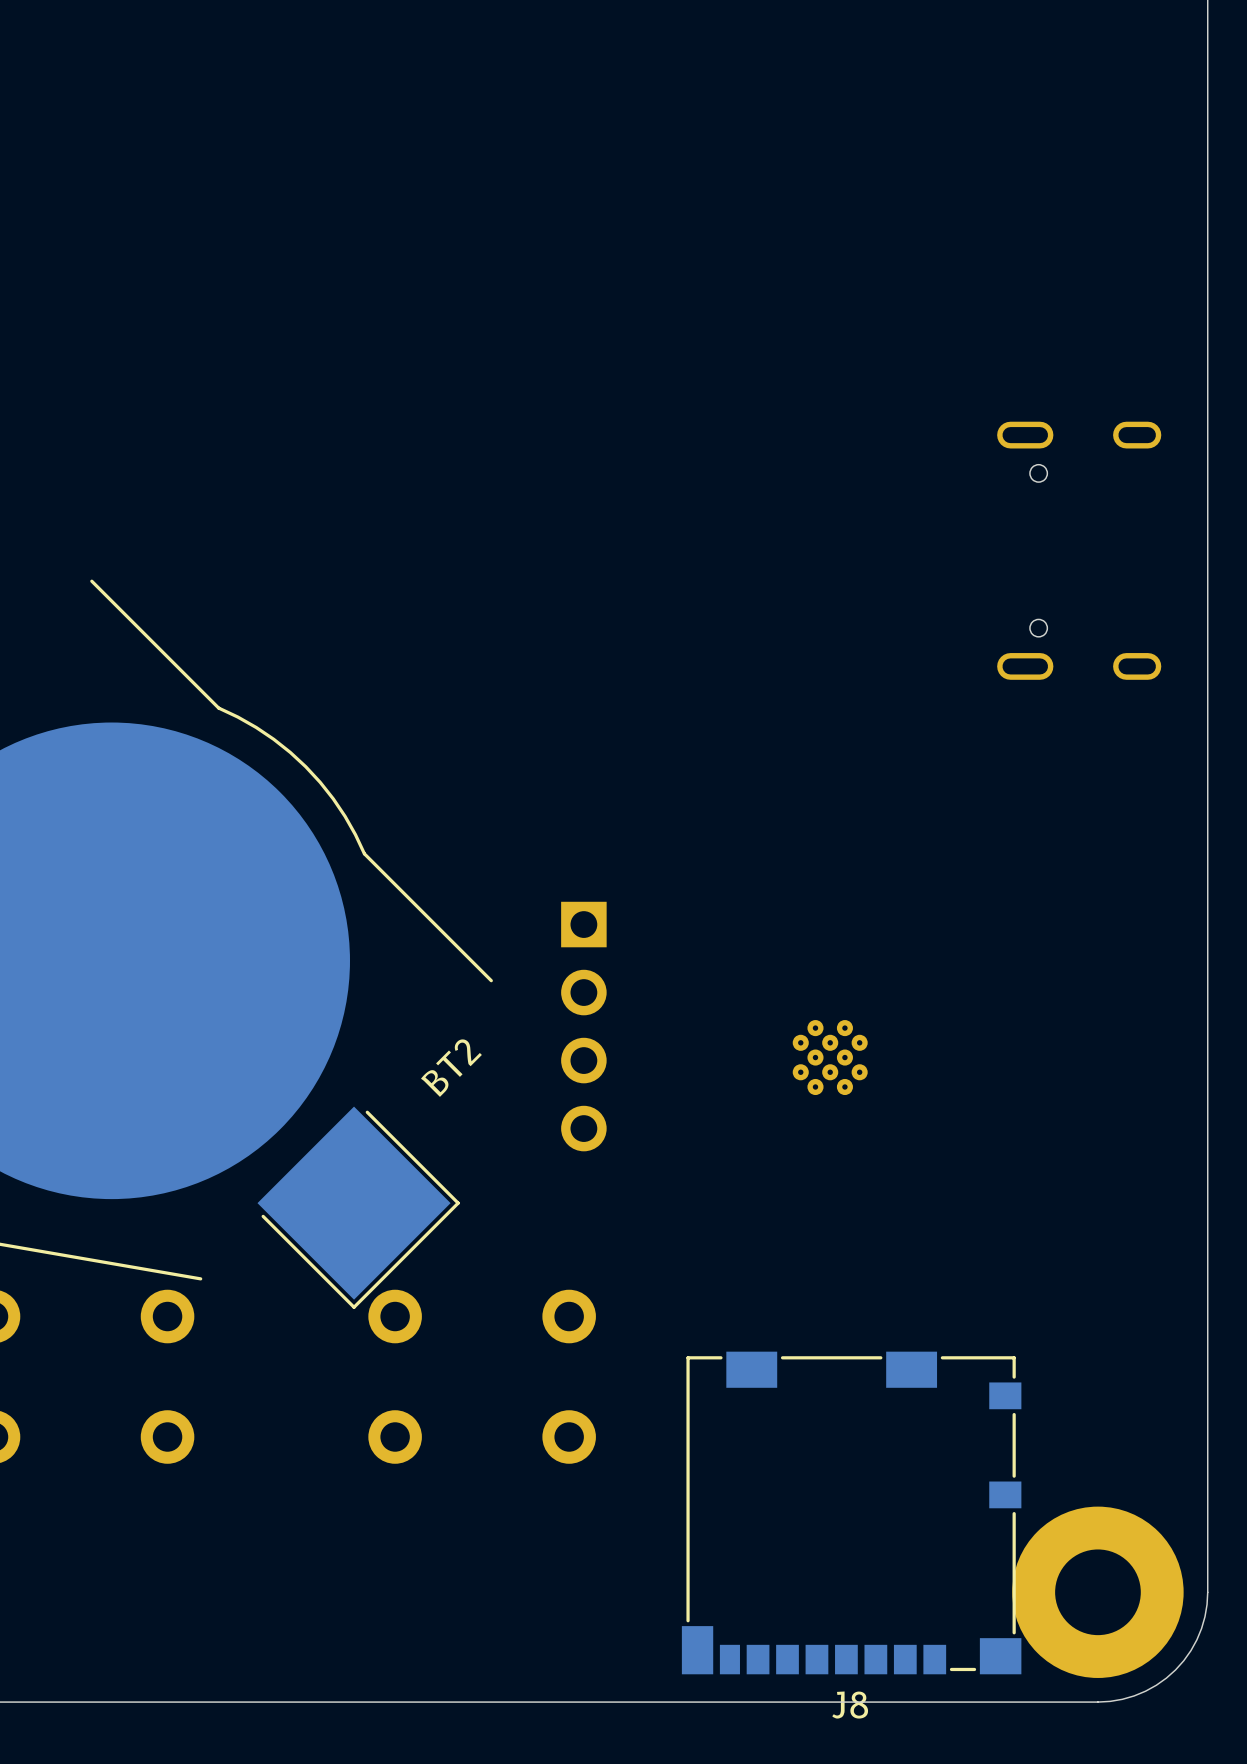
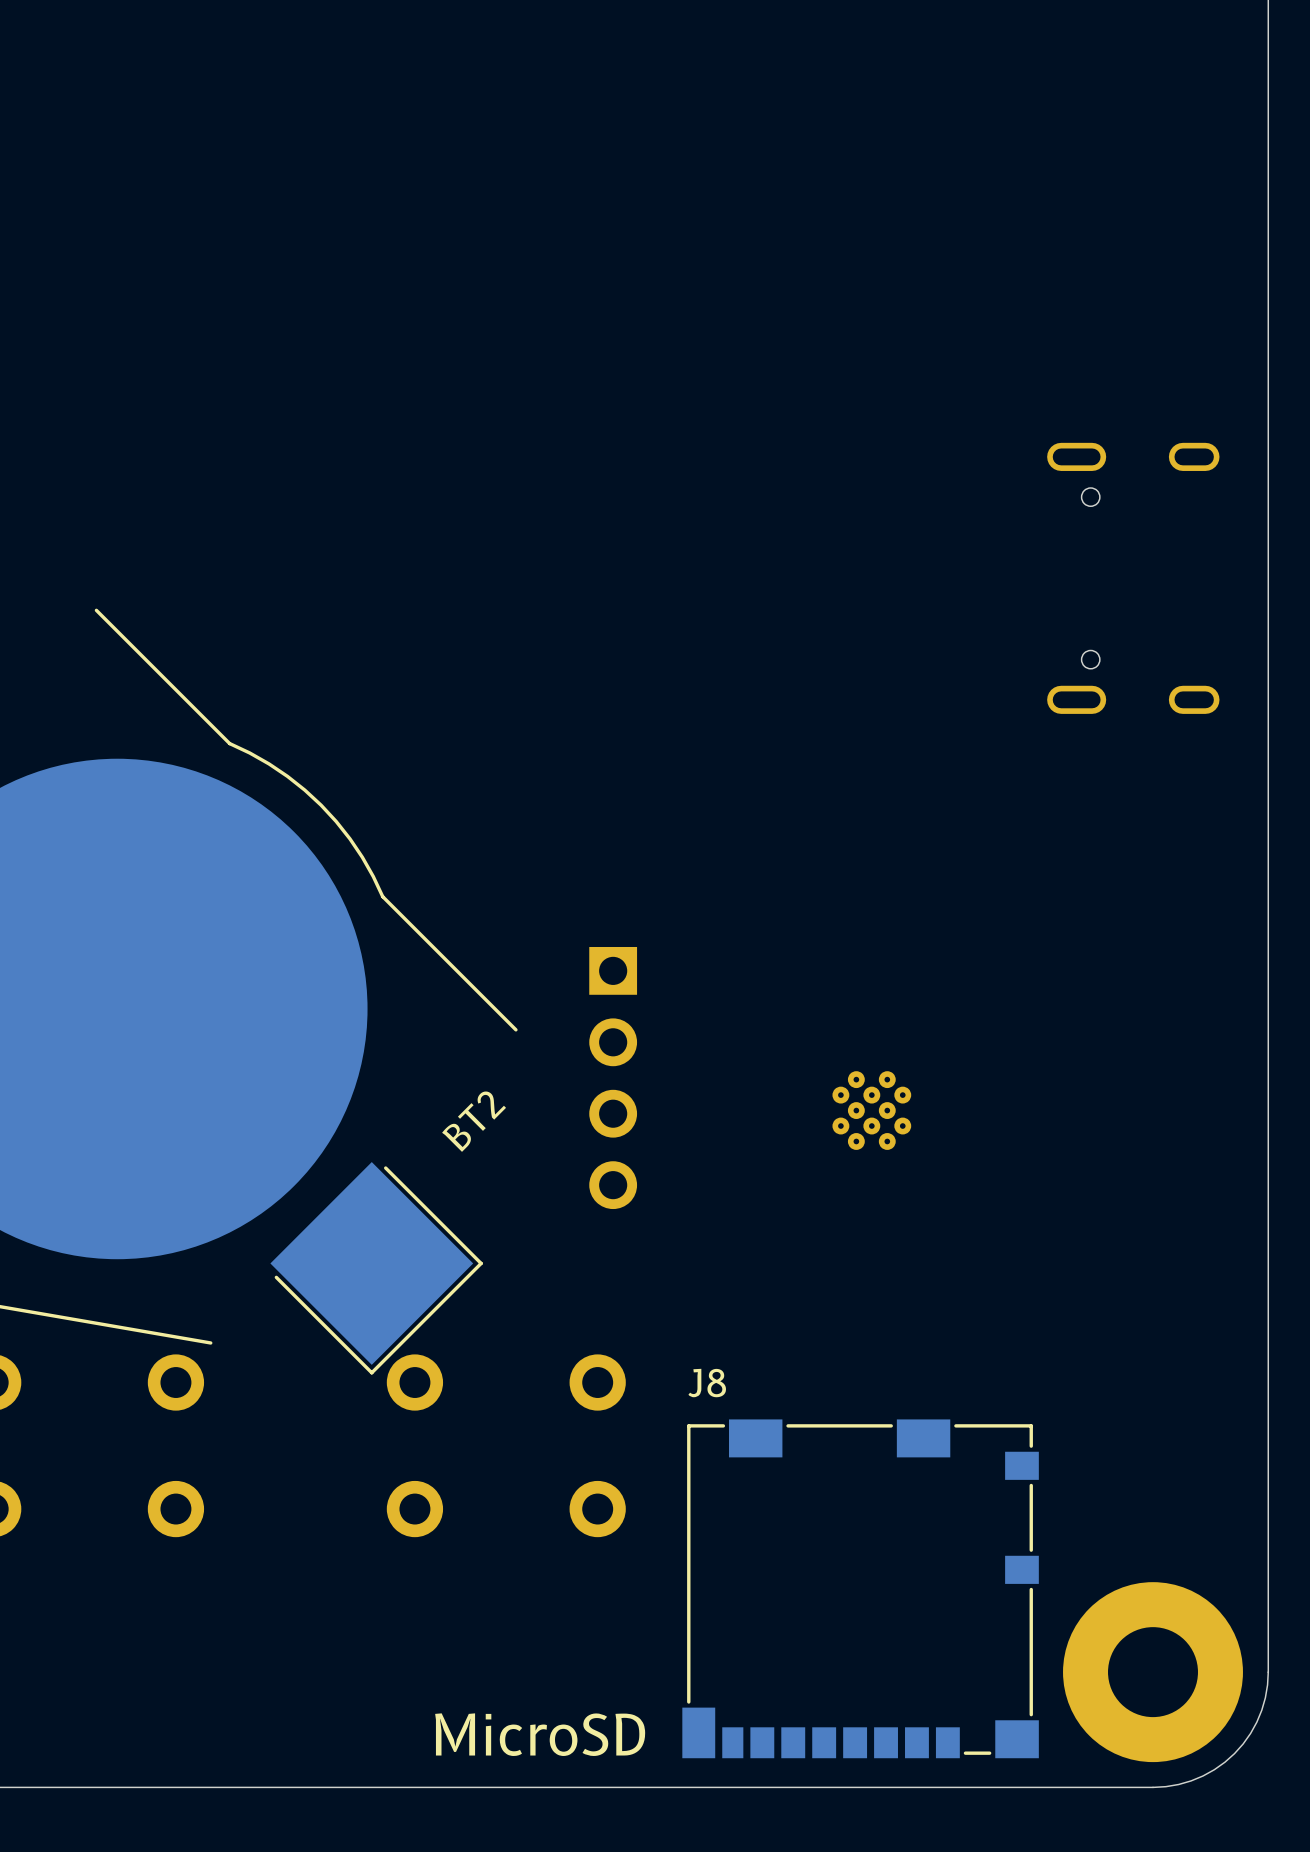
J8 position: (851, 1512) -> (860, 1588)
text: none -> MicroSD (540, 1734)
J8 name position: J8 (850, 1705) -> J8 (707, 1383)

